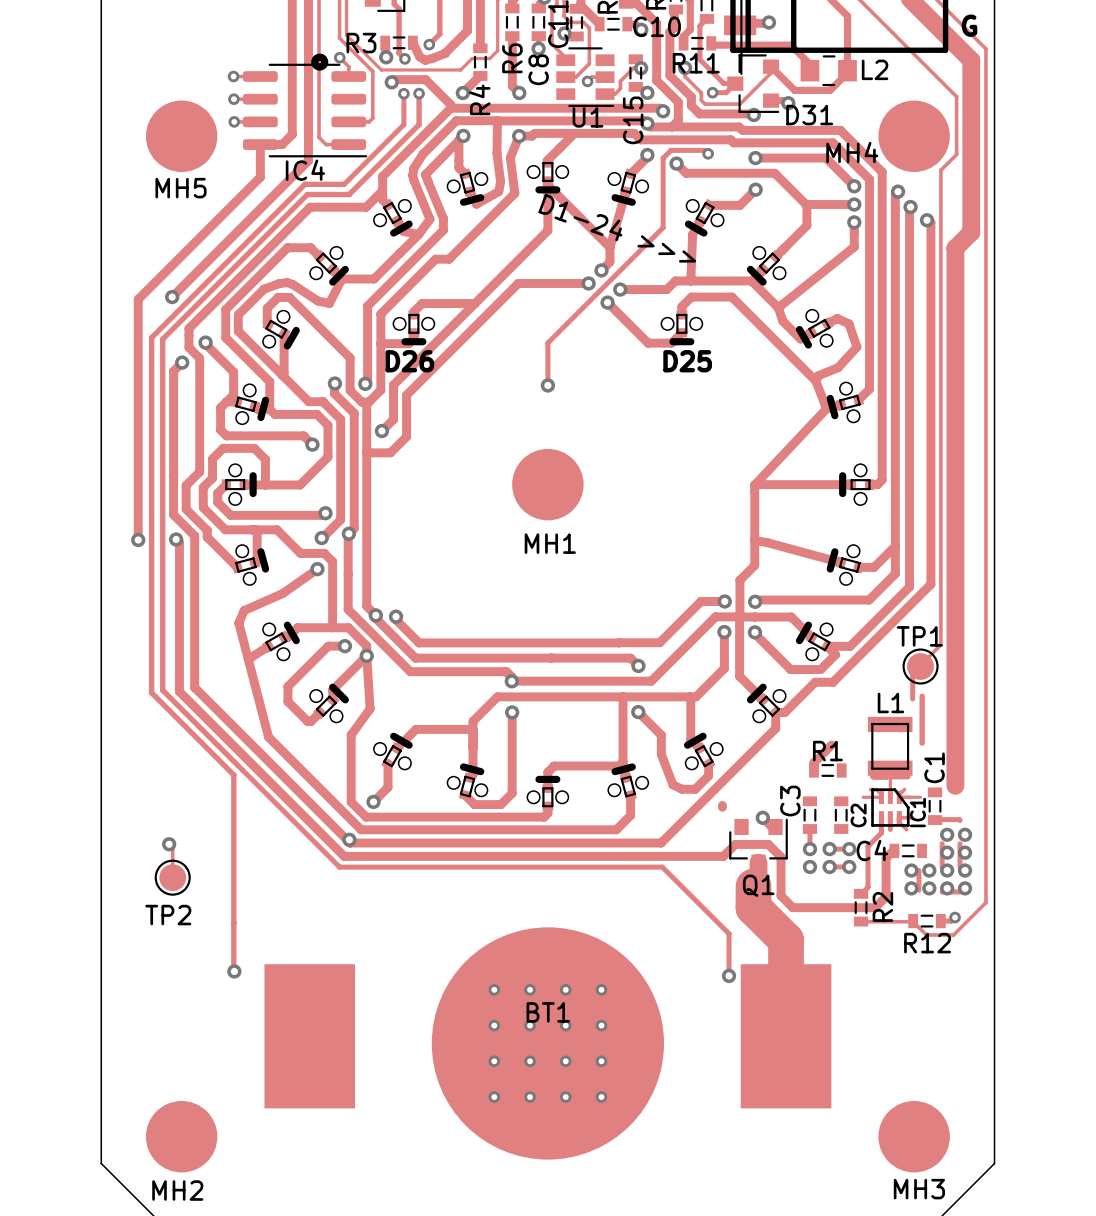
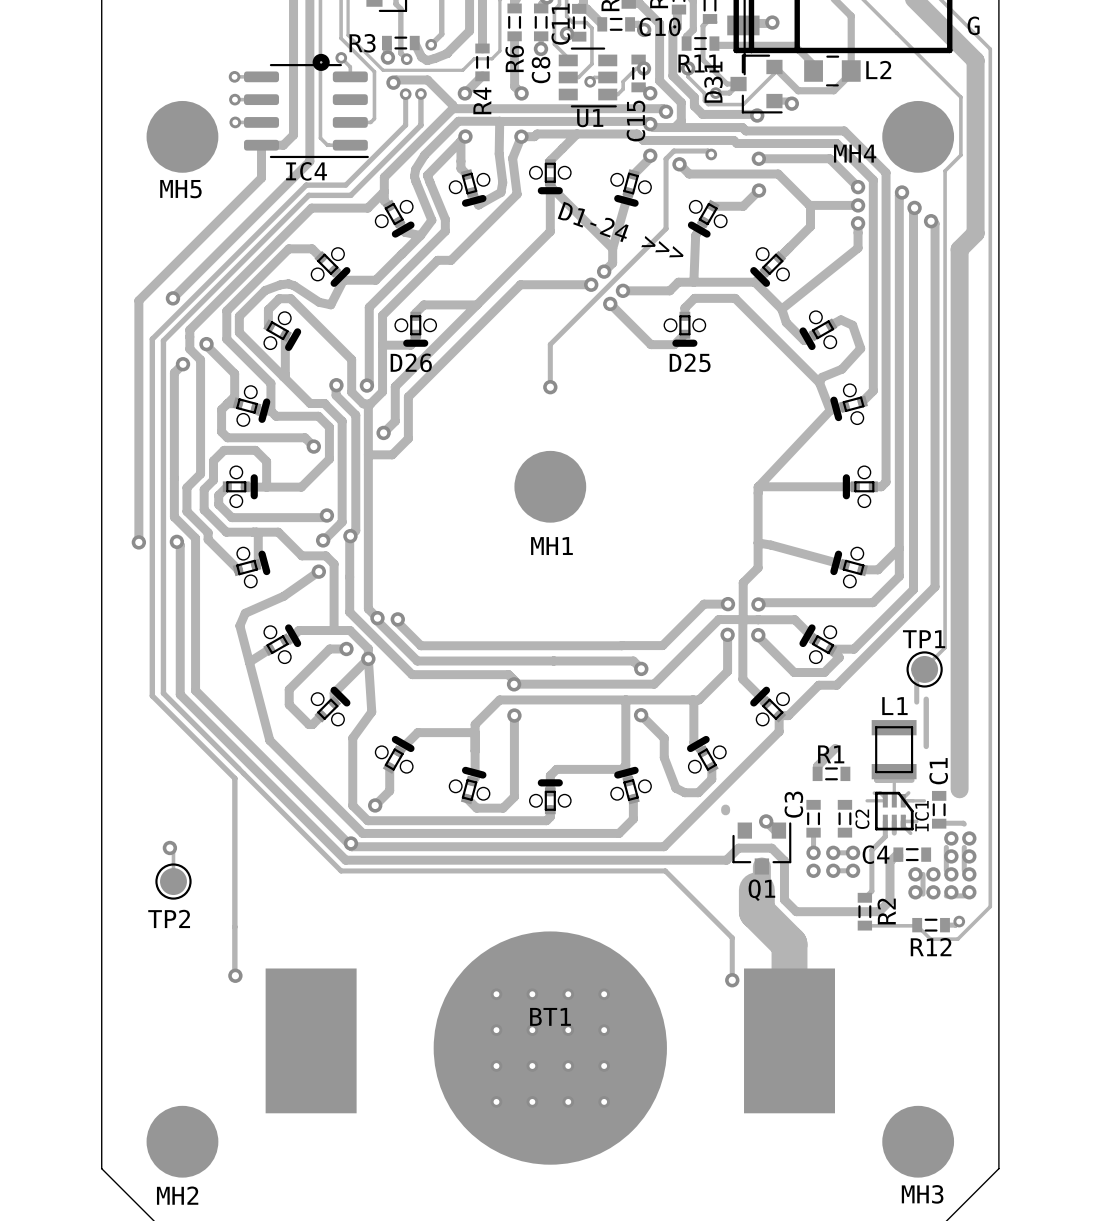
D31 name rotation: 0° (809, 115) -> 90° counterclockwise (713, 82)
D31 name position: D31 (809, 115) -> D31 (713, 82)

